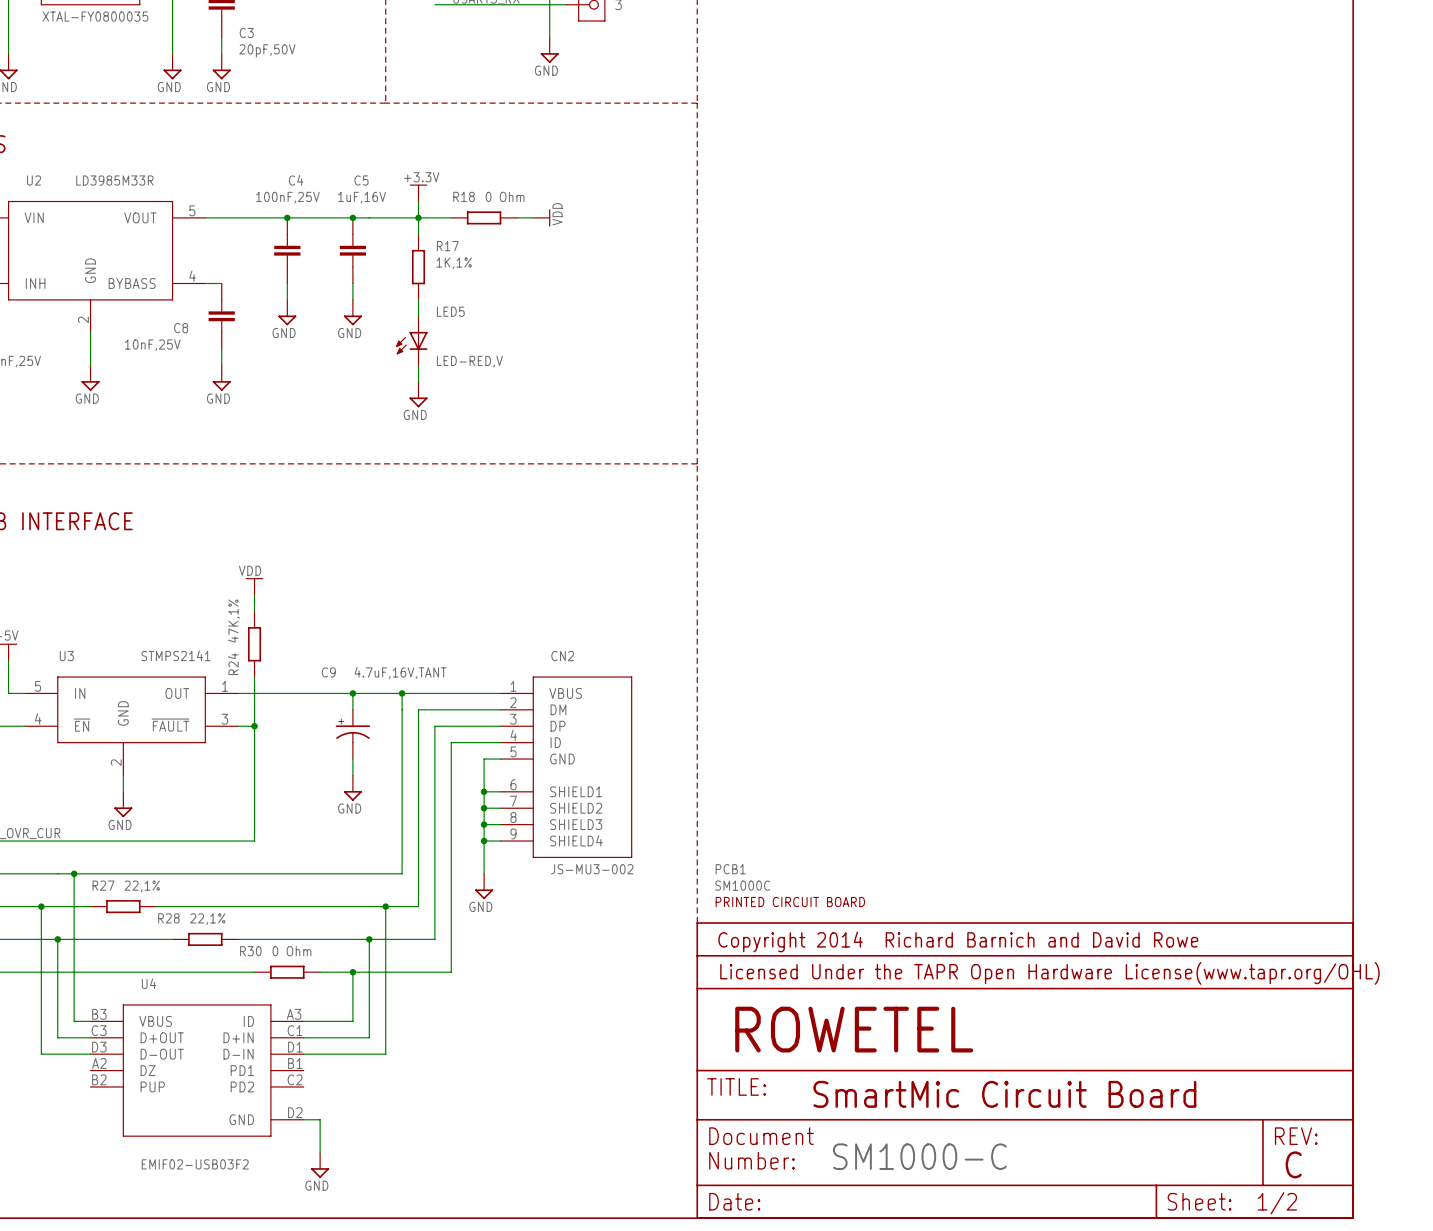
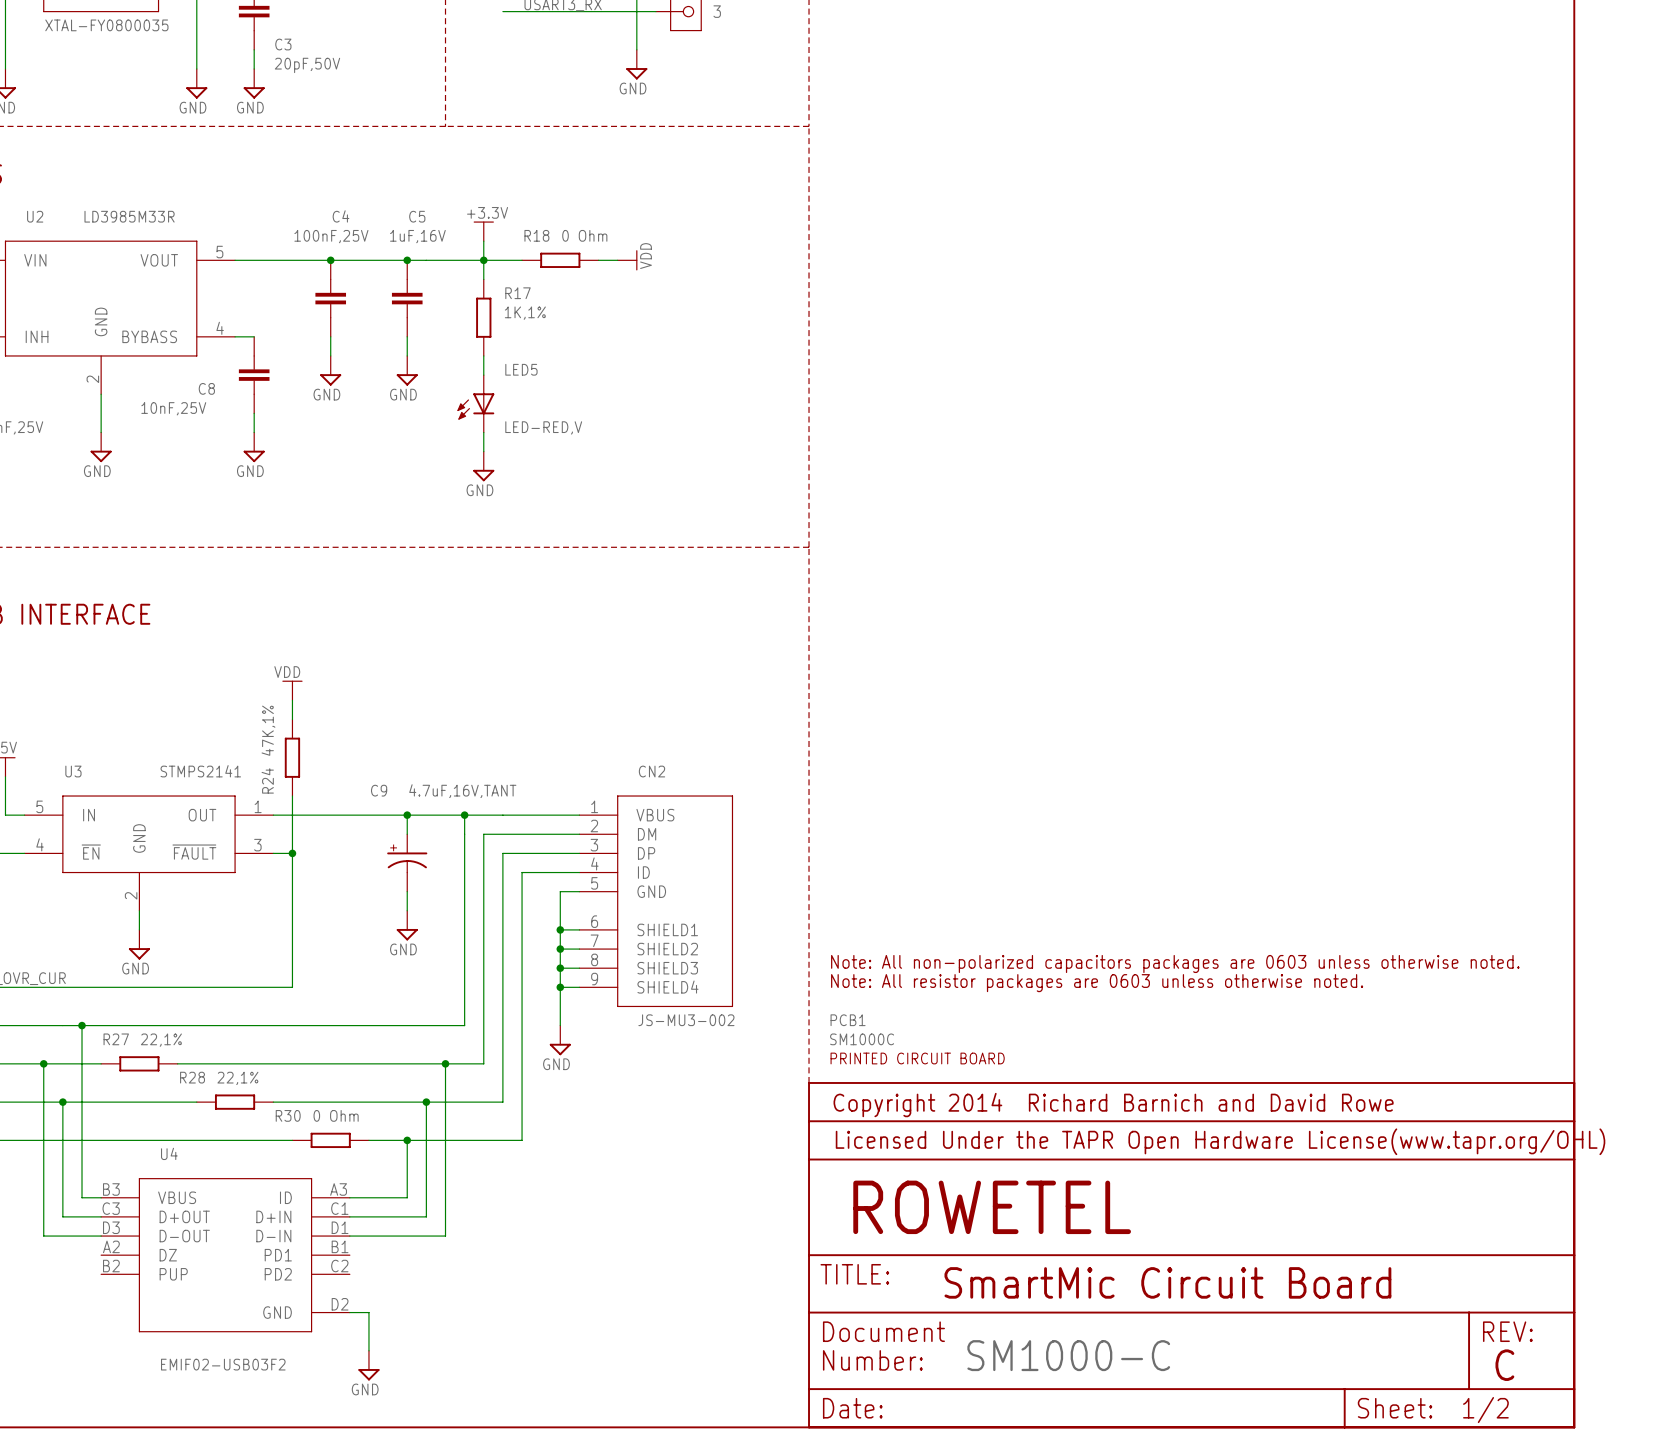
text: none -> Note: All non-polarized capacitors packages are 0603 unless otherwise noted. (1175, 963)
text: none -> Note: All resistor packages are 0603 unless otherwise noted. (1097, 983)

